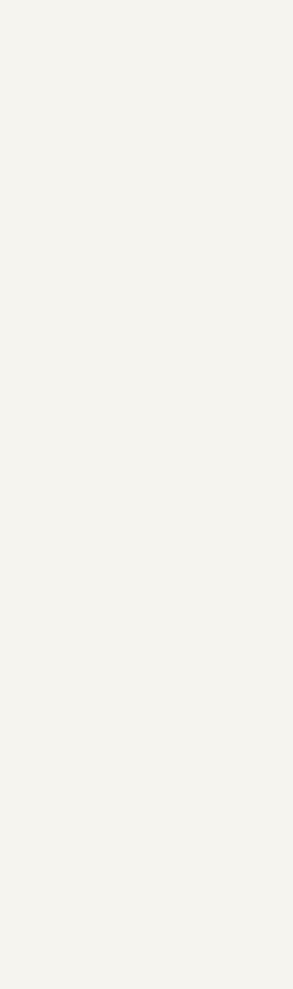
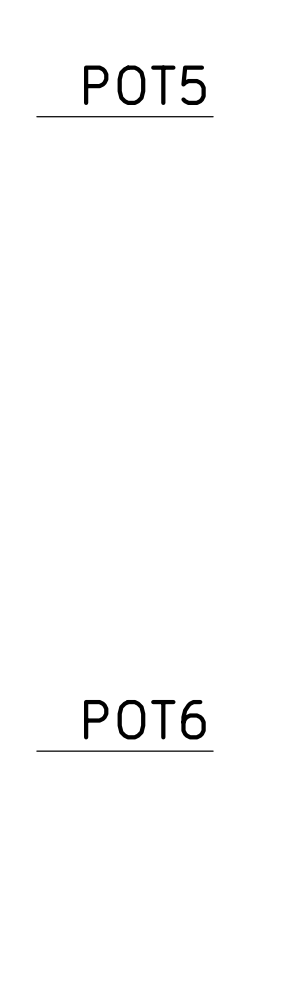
label: none -> POT5 (144, 85)
wire: none -> (36, 116) (213, 116)
label: none -> POT6 (144, 719)
wire: none -> (36, 751) (213, 751)

